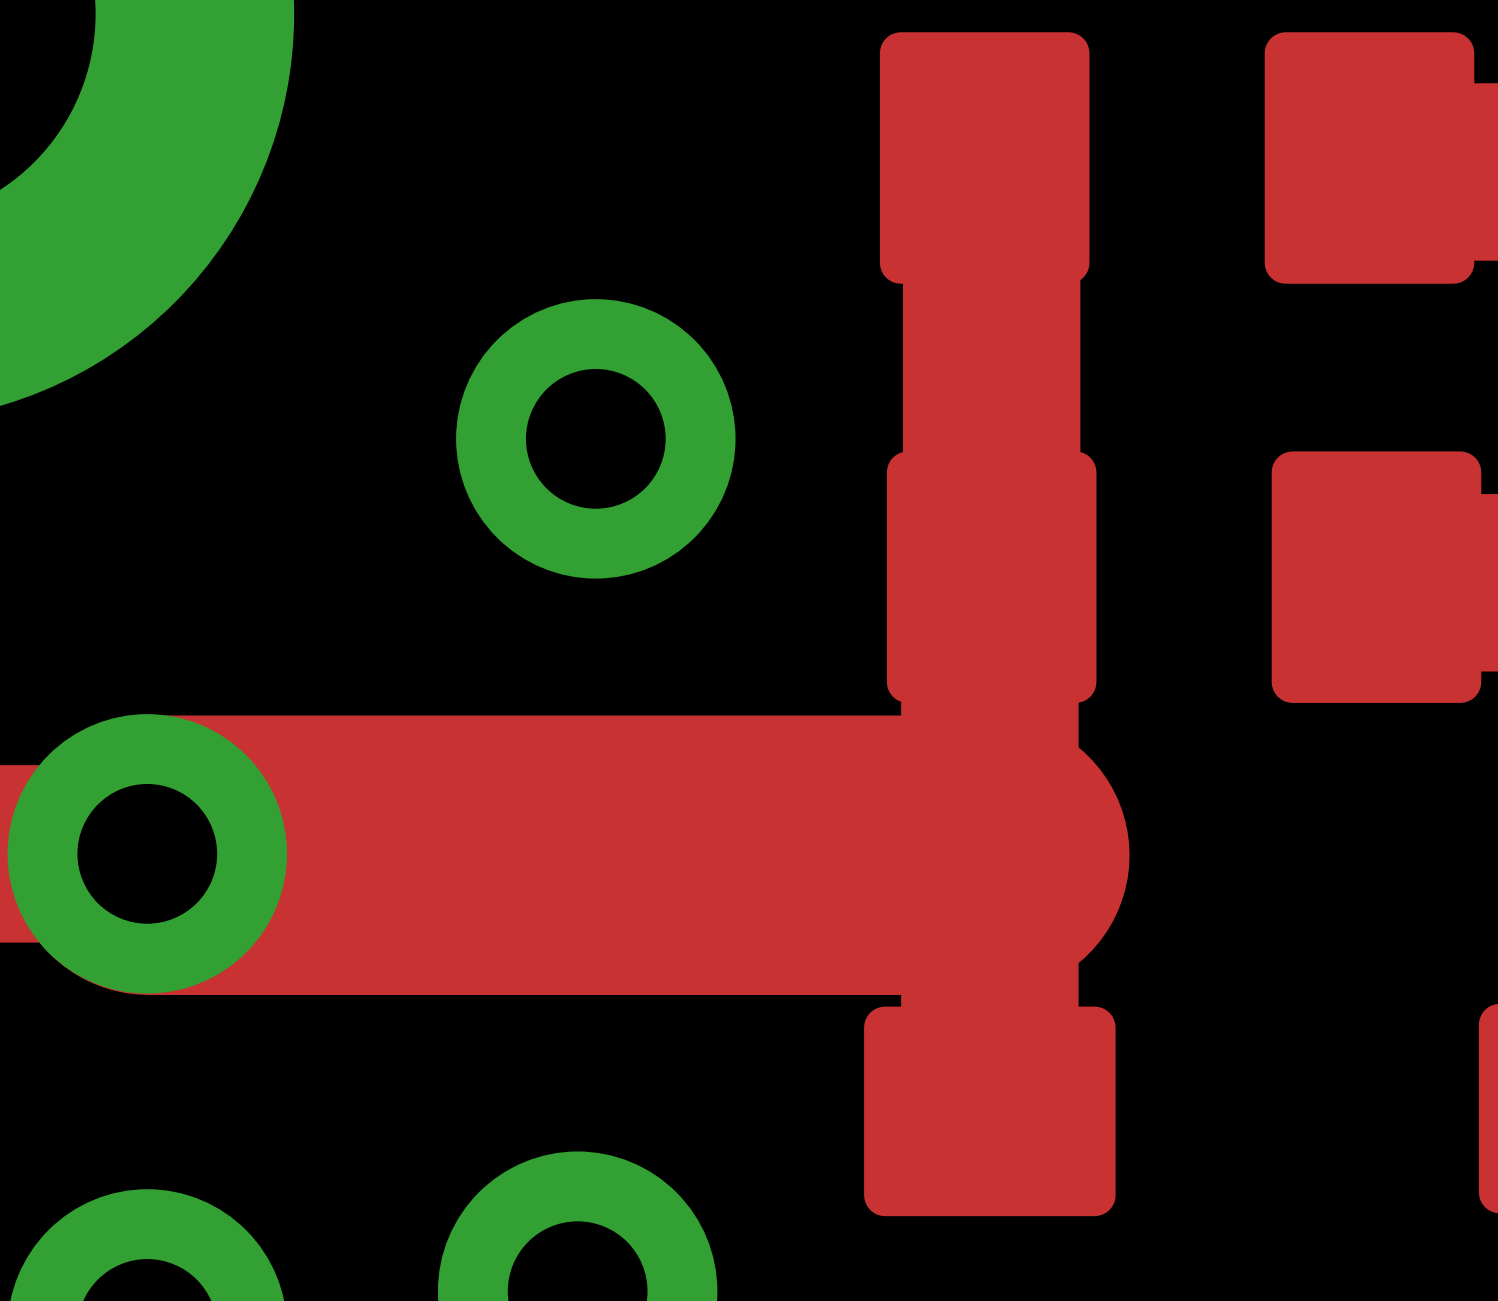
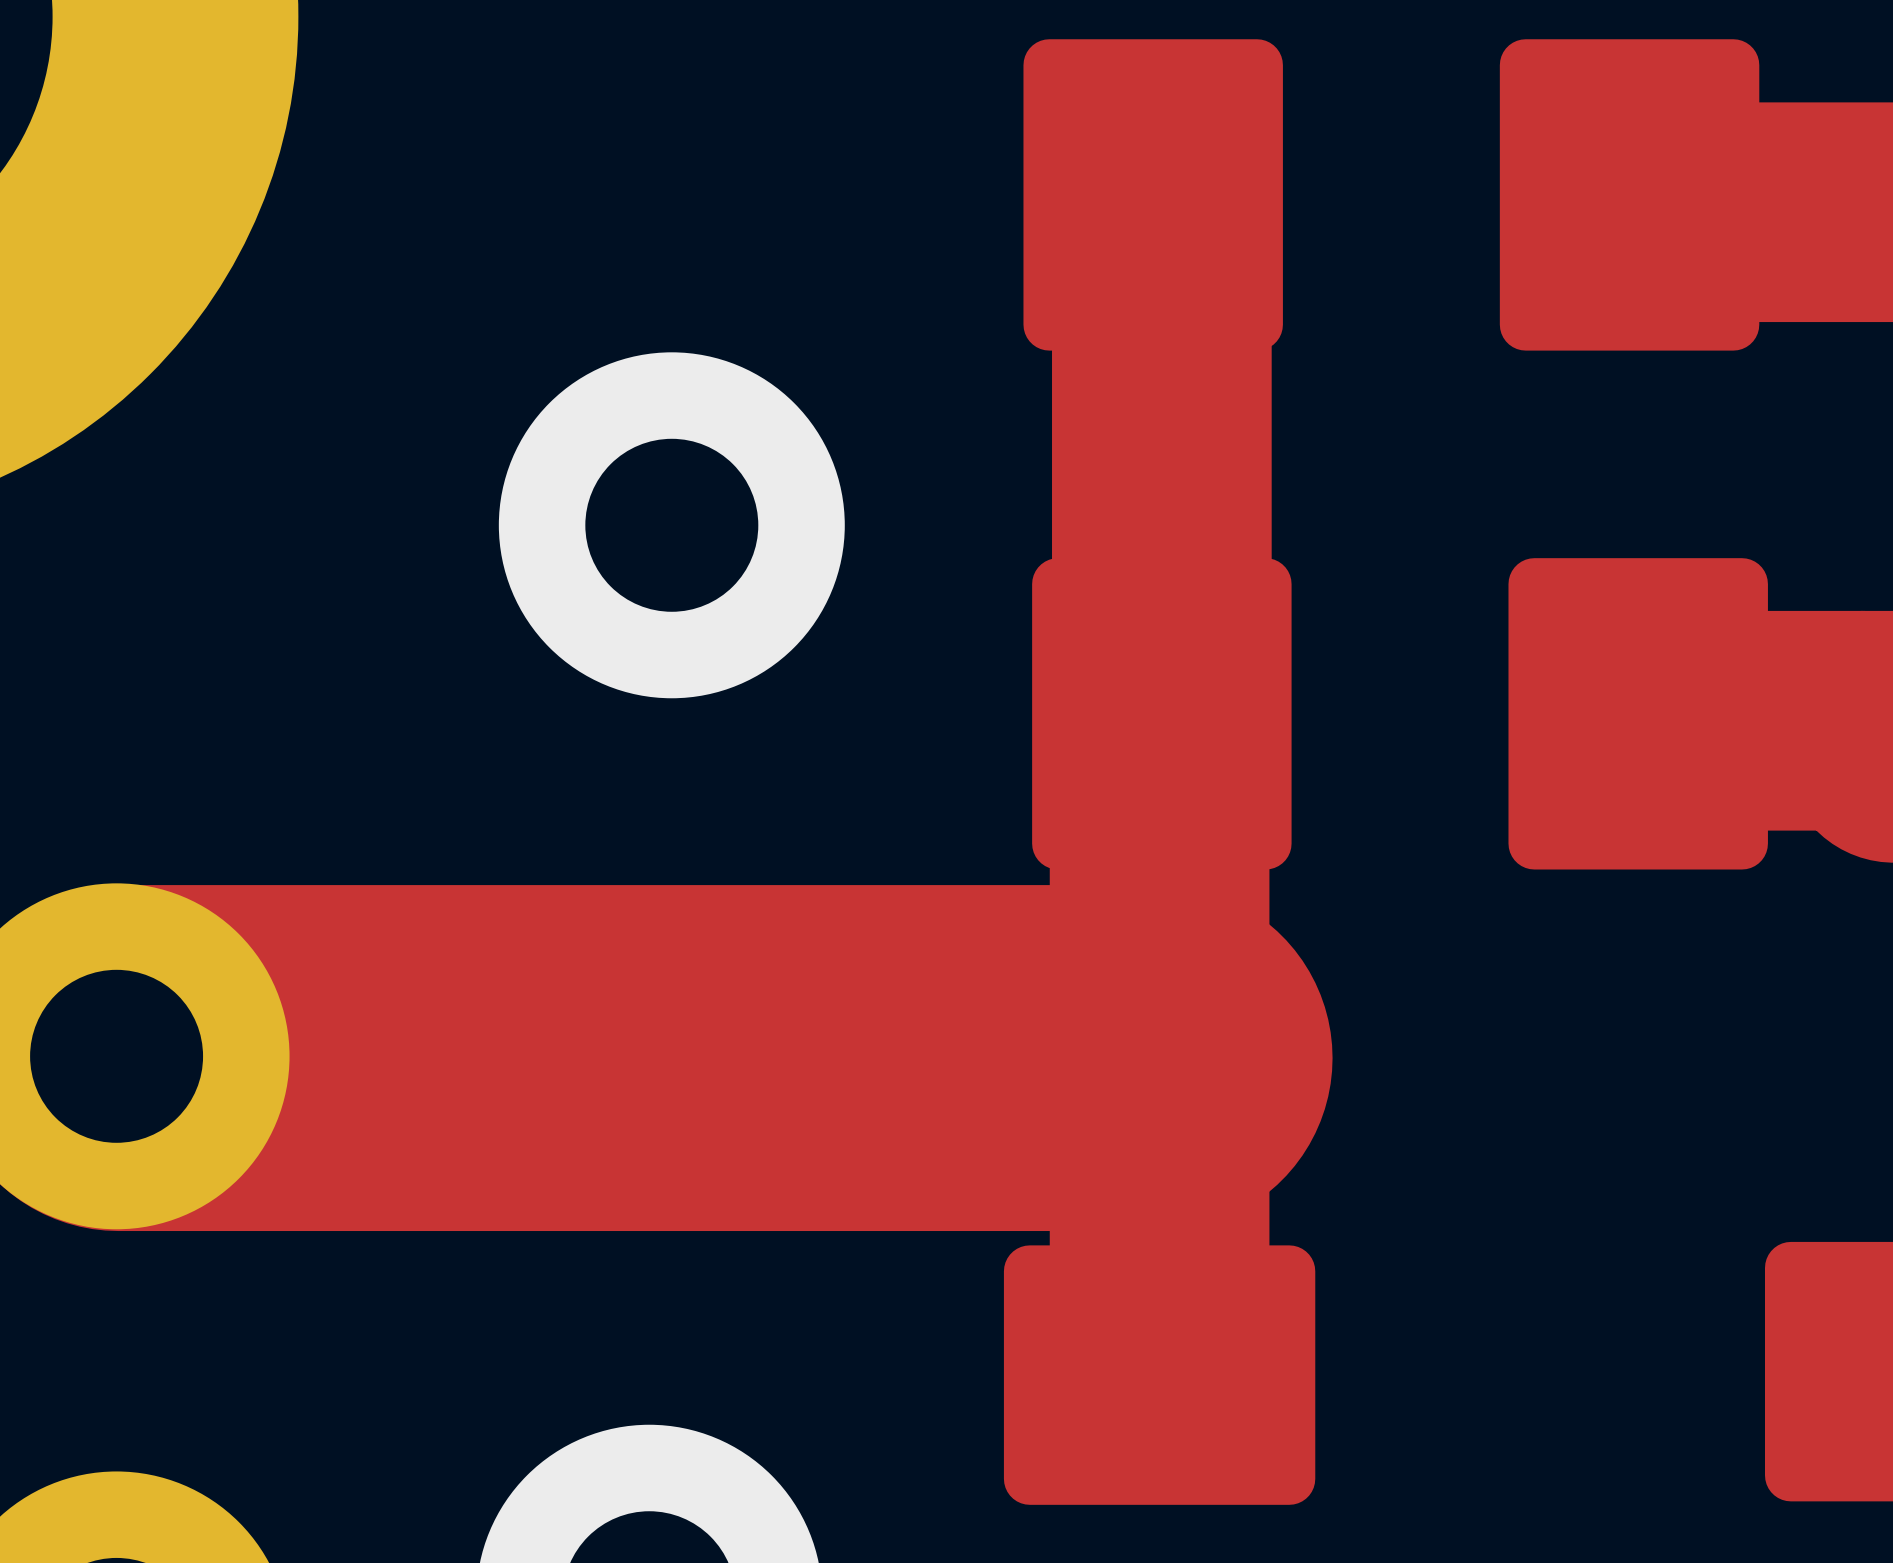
via position: (595, 438) -> (671, 525)

